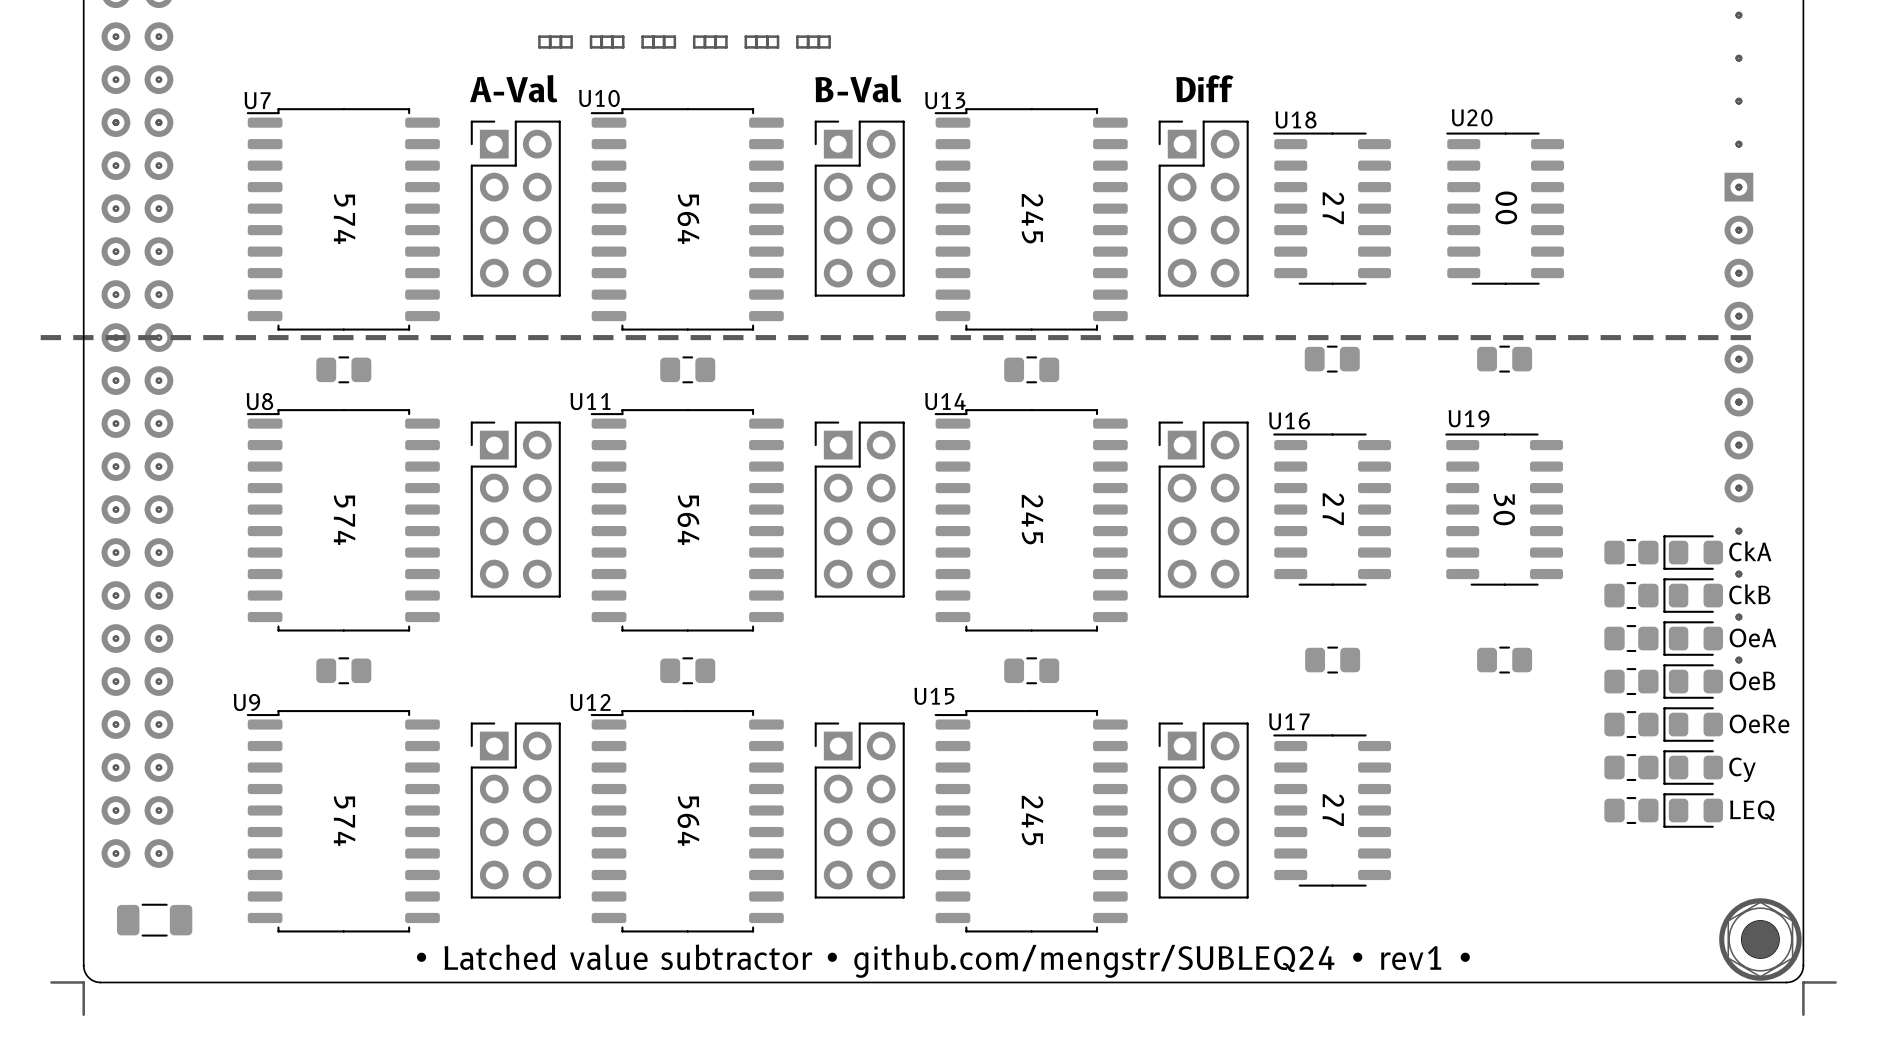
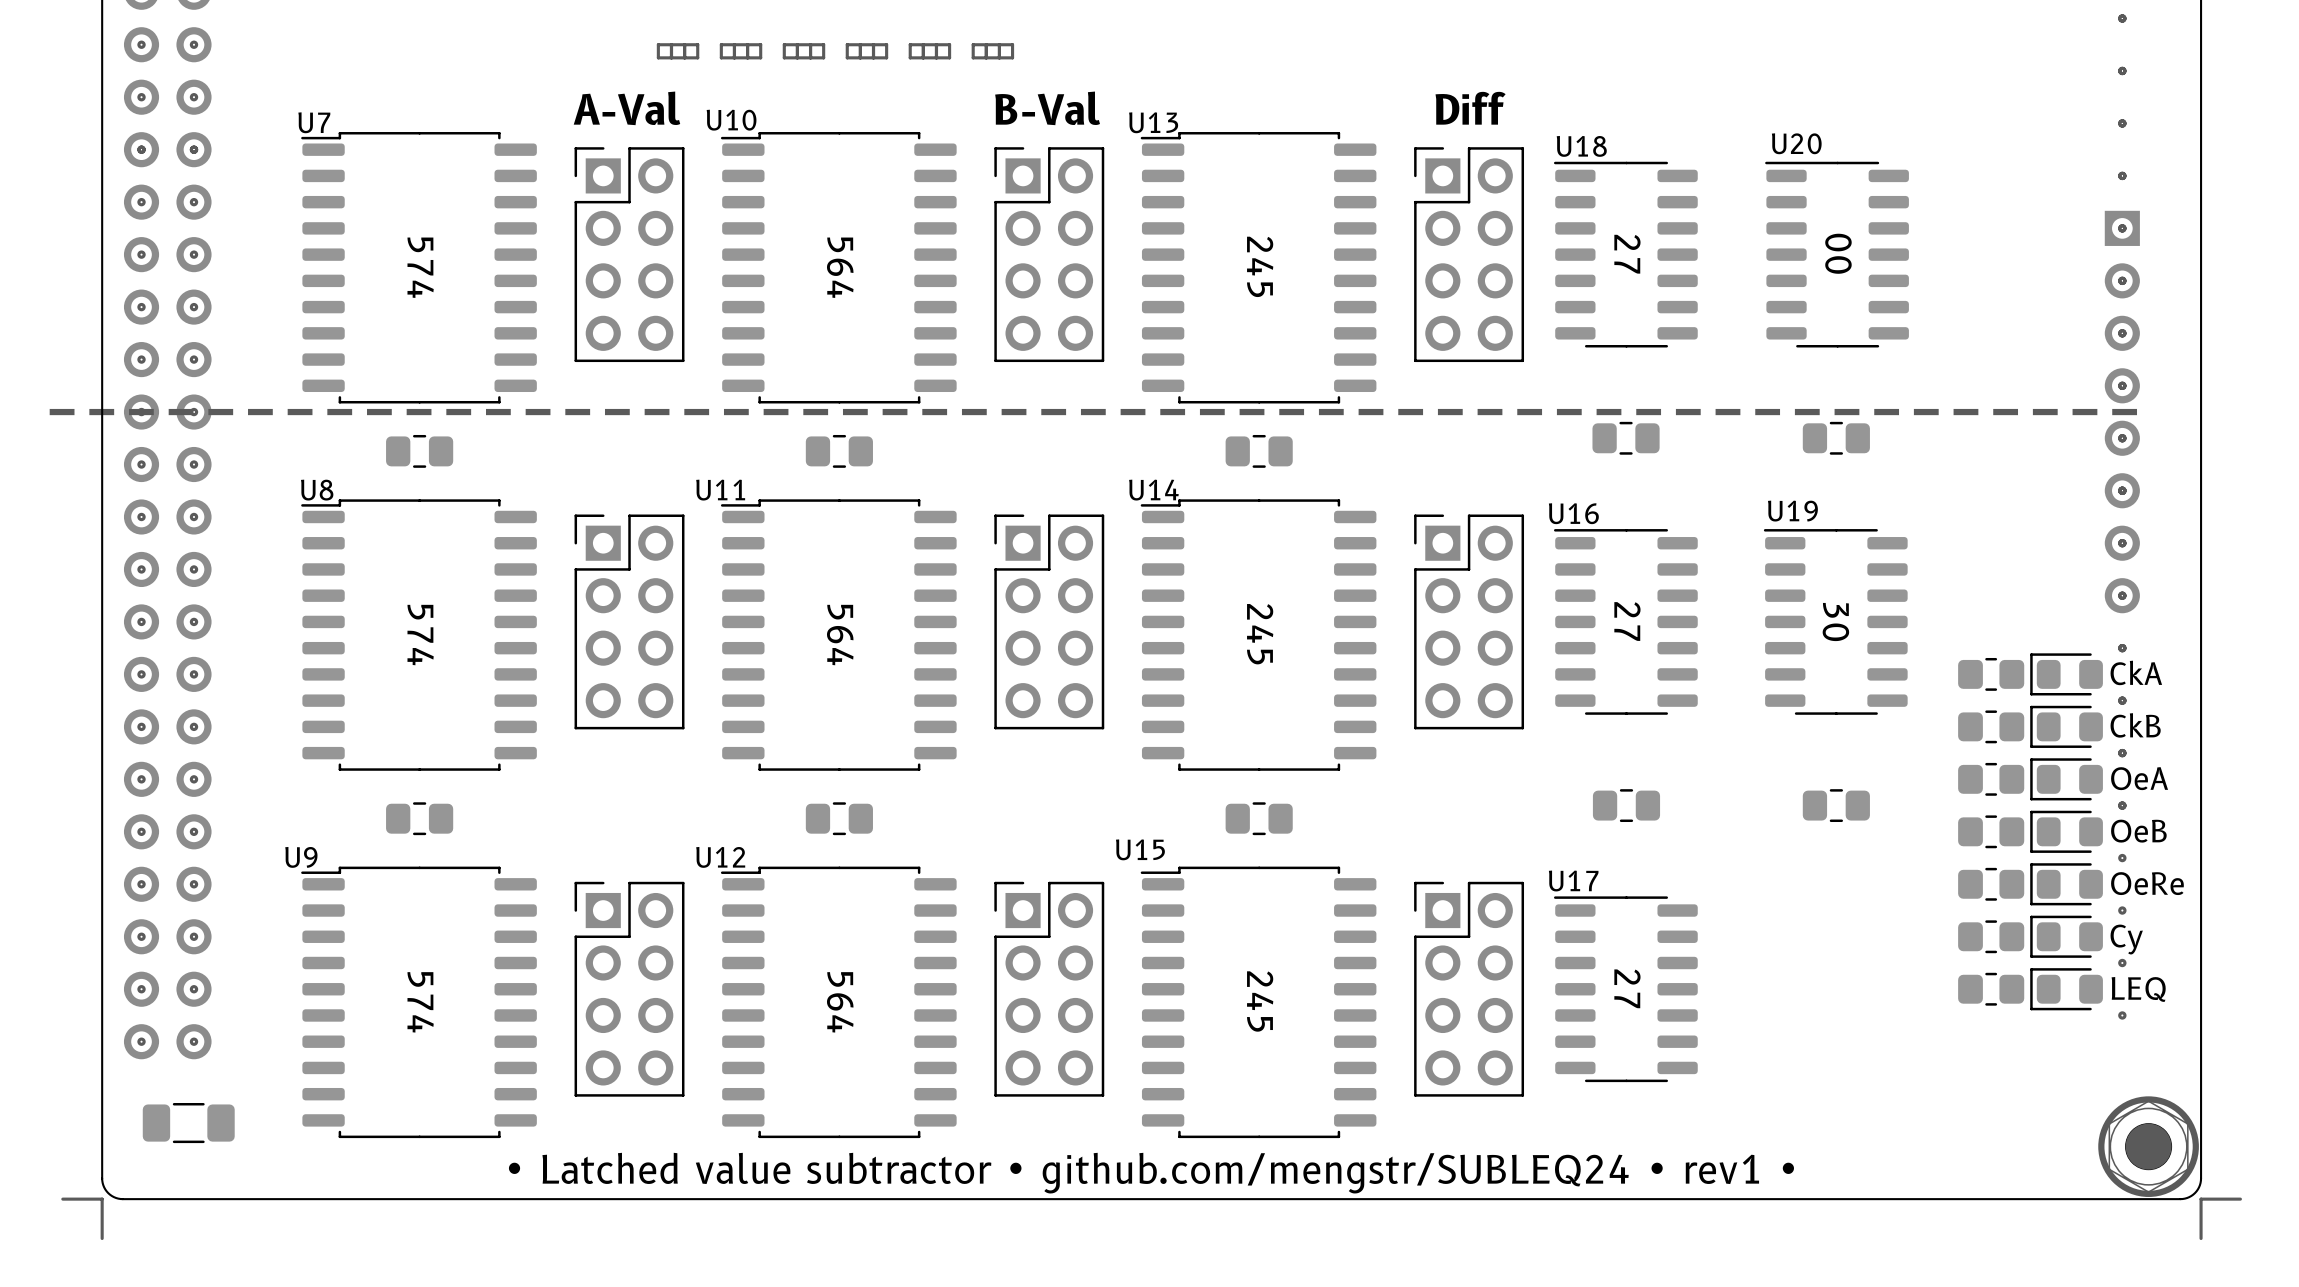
drawing: none -> [2118, 853, 2127, 863]
drawing: none -> [2118, 906, 2127, 915]
drawing: none -> [2118, 958, 2127, 968]
drawing: none -> [2118, 1011, 2127, 1020]

